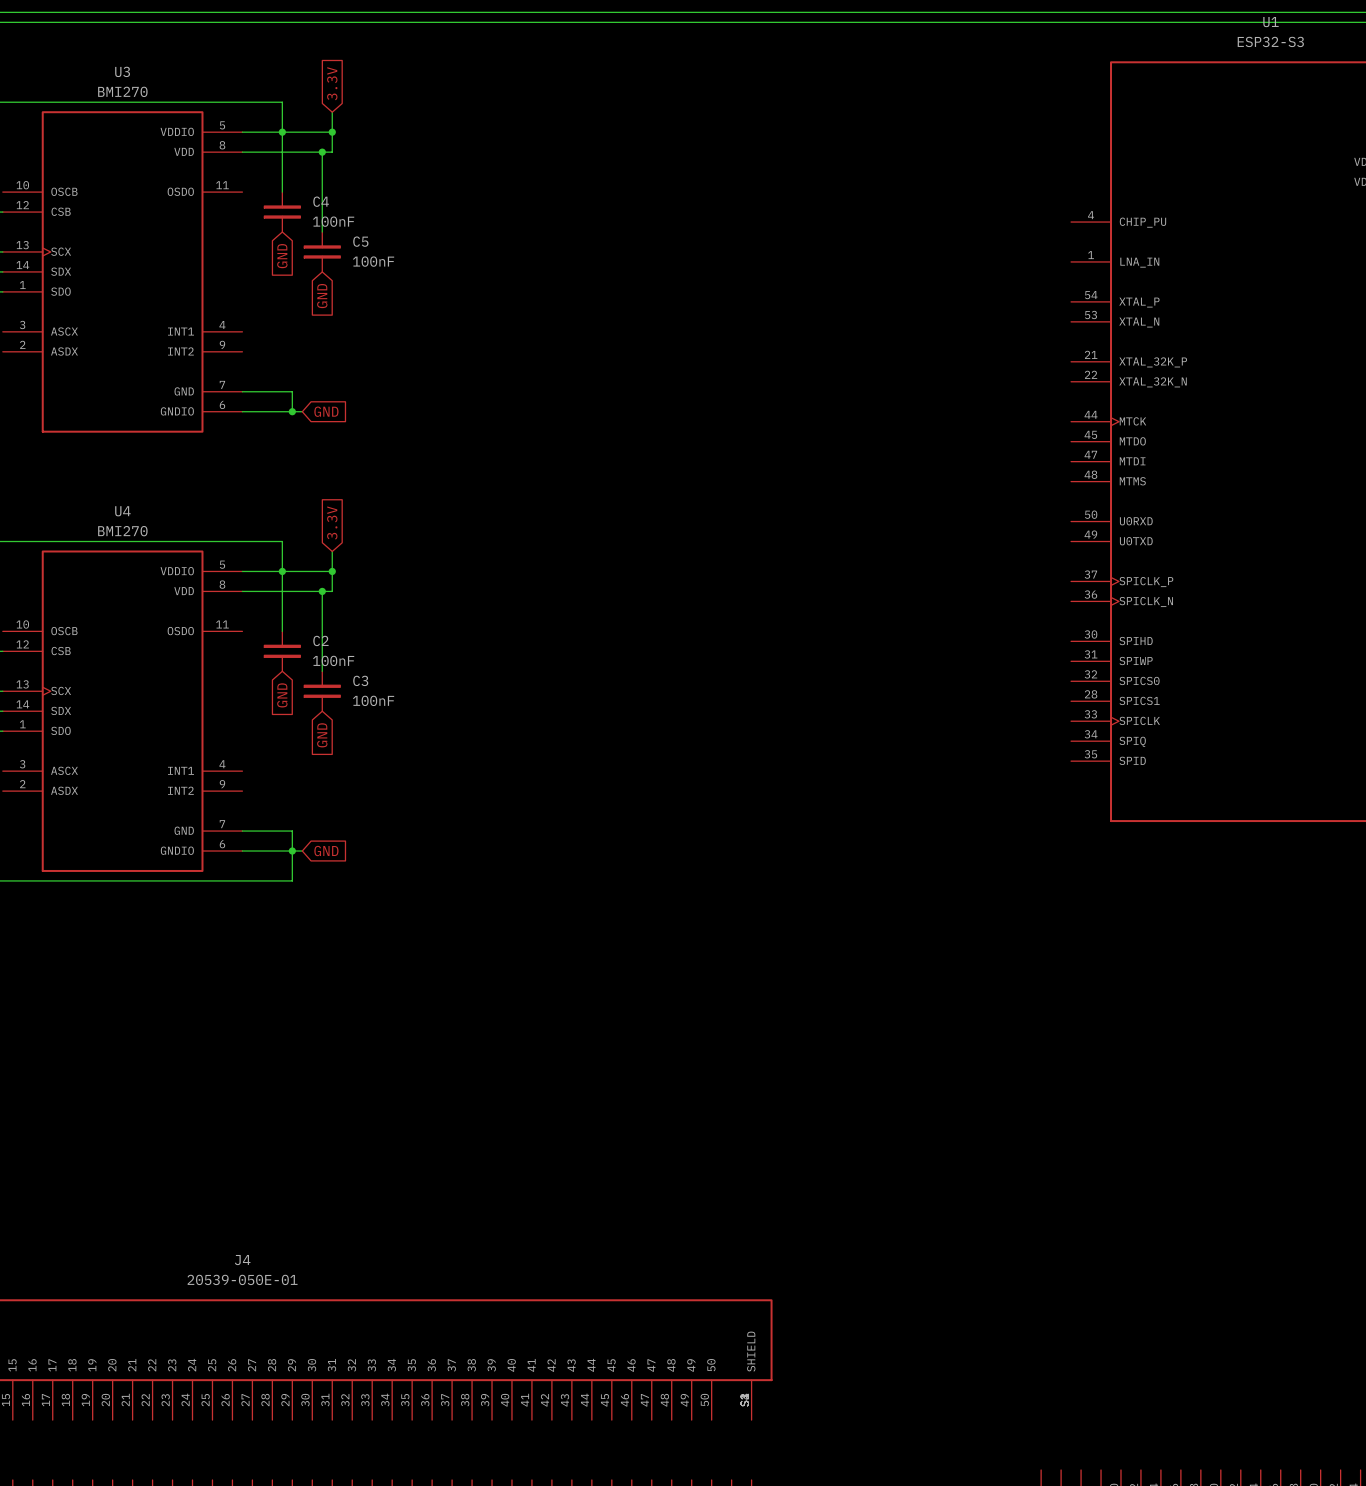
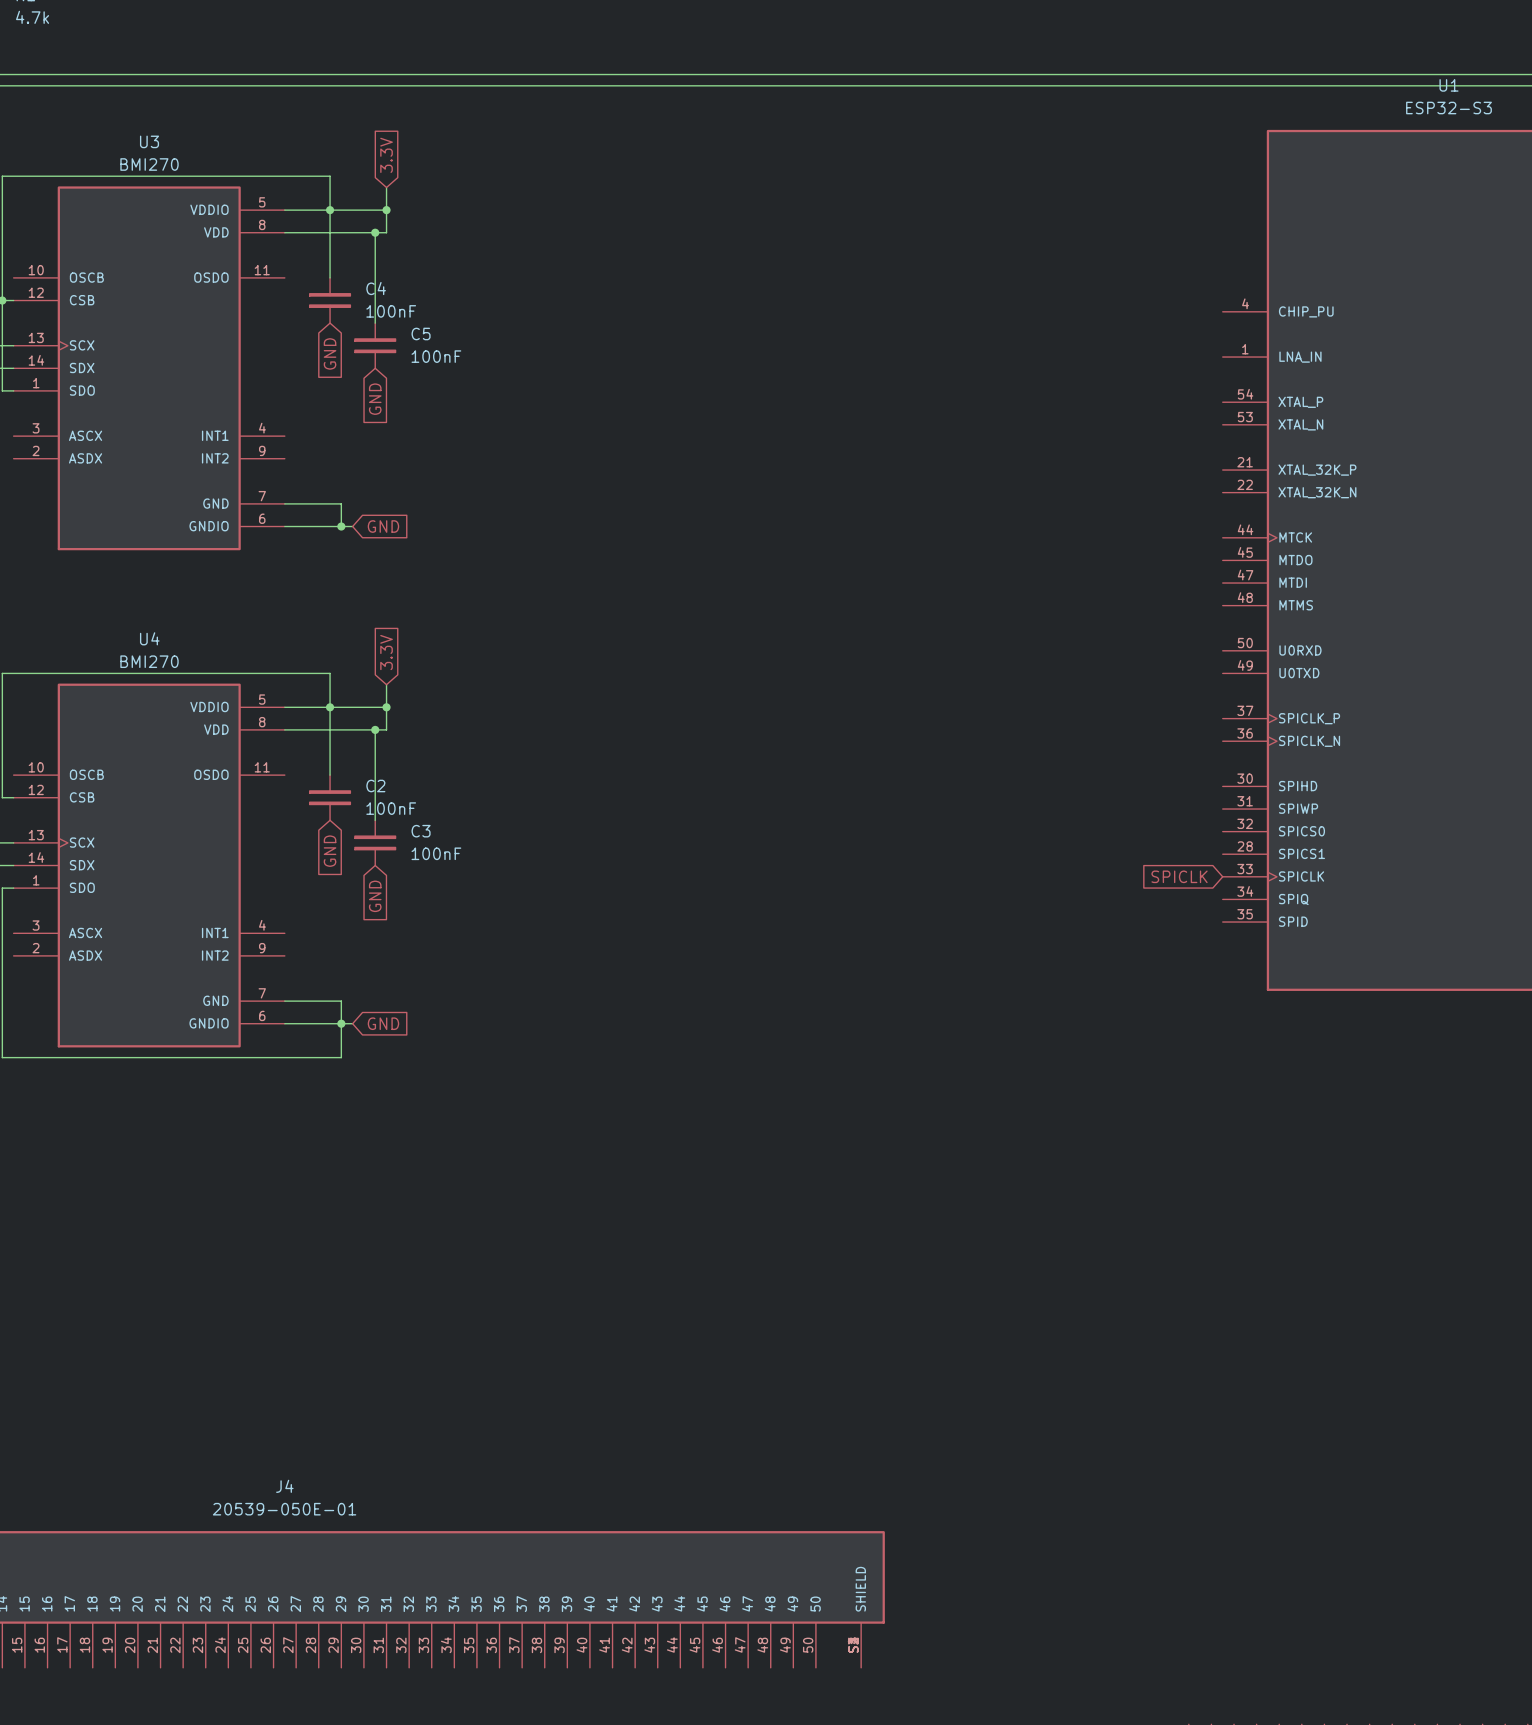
global label: none -> SPICLK (1179, 876)

